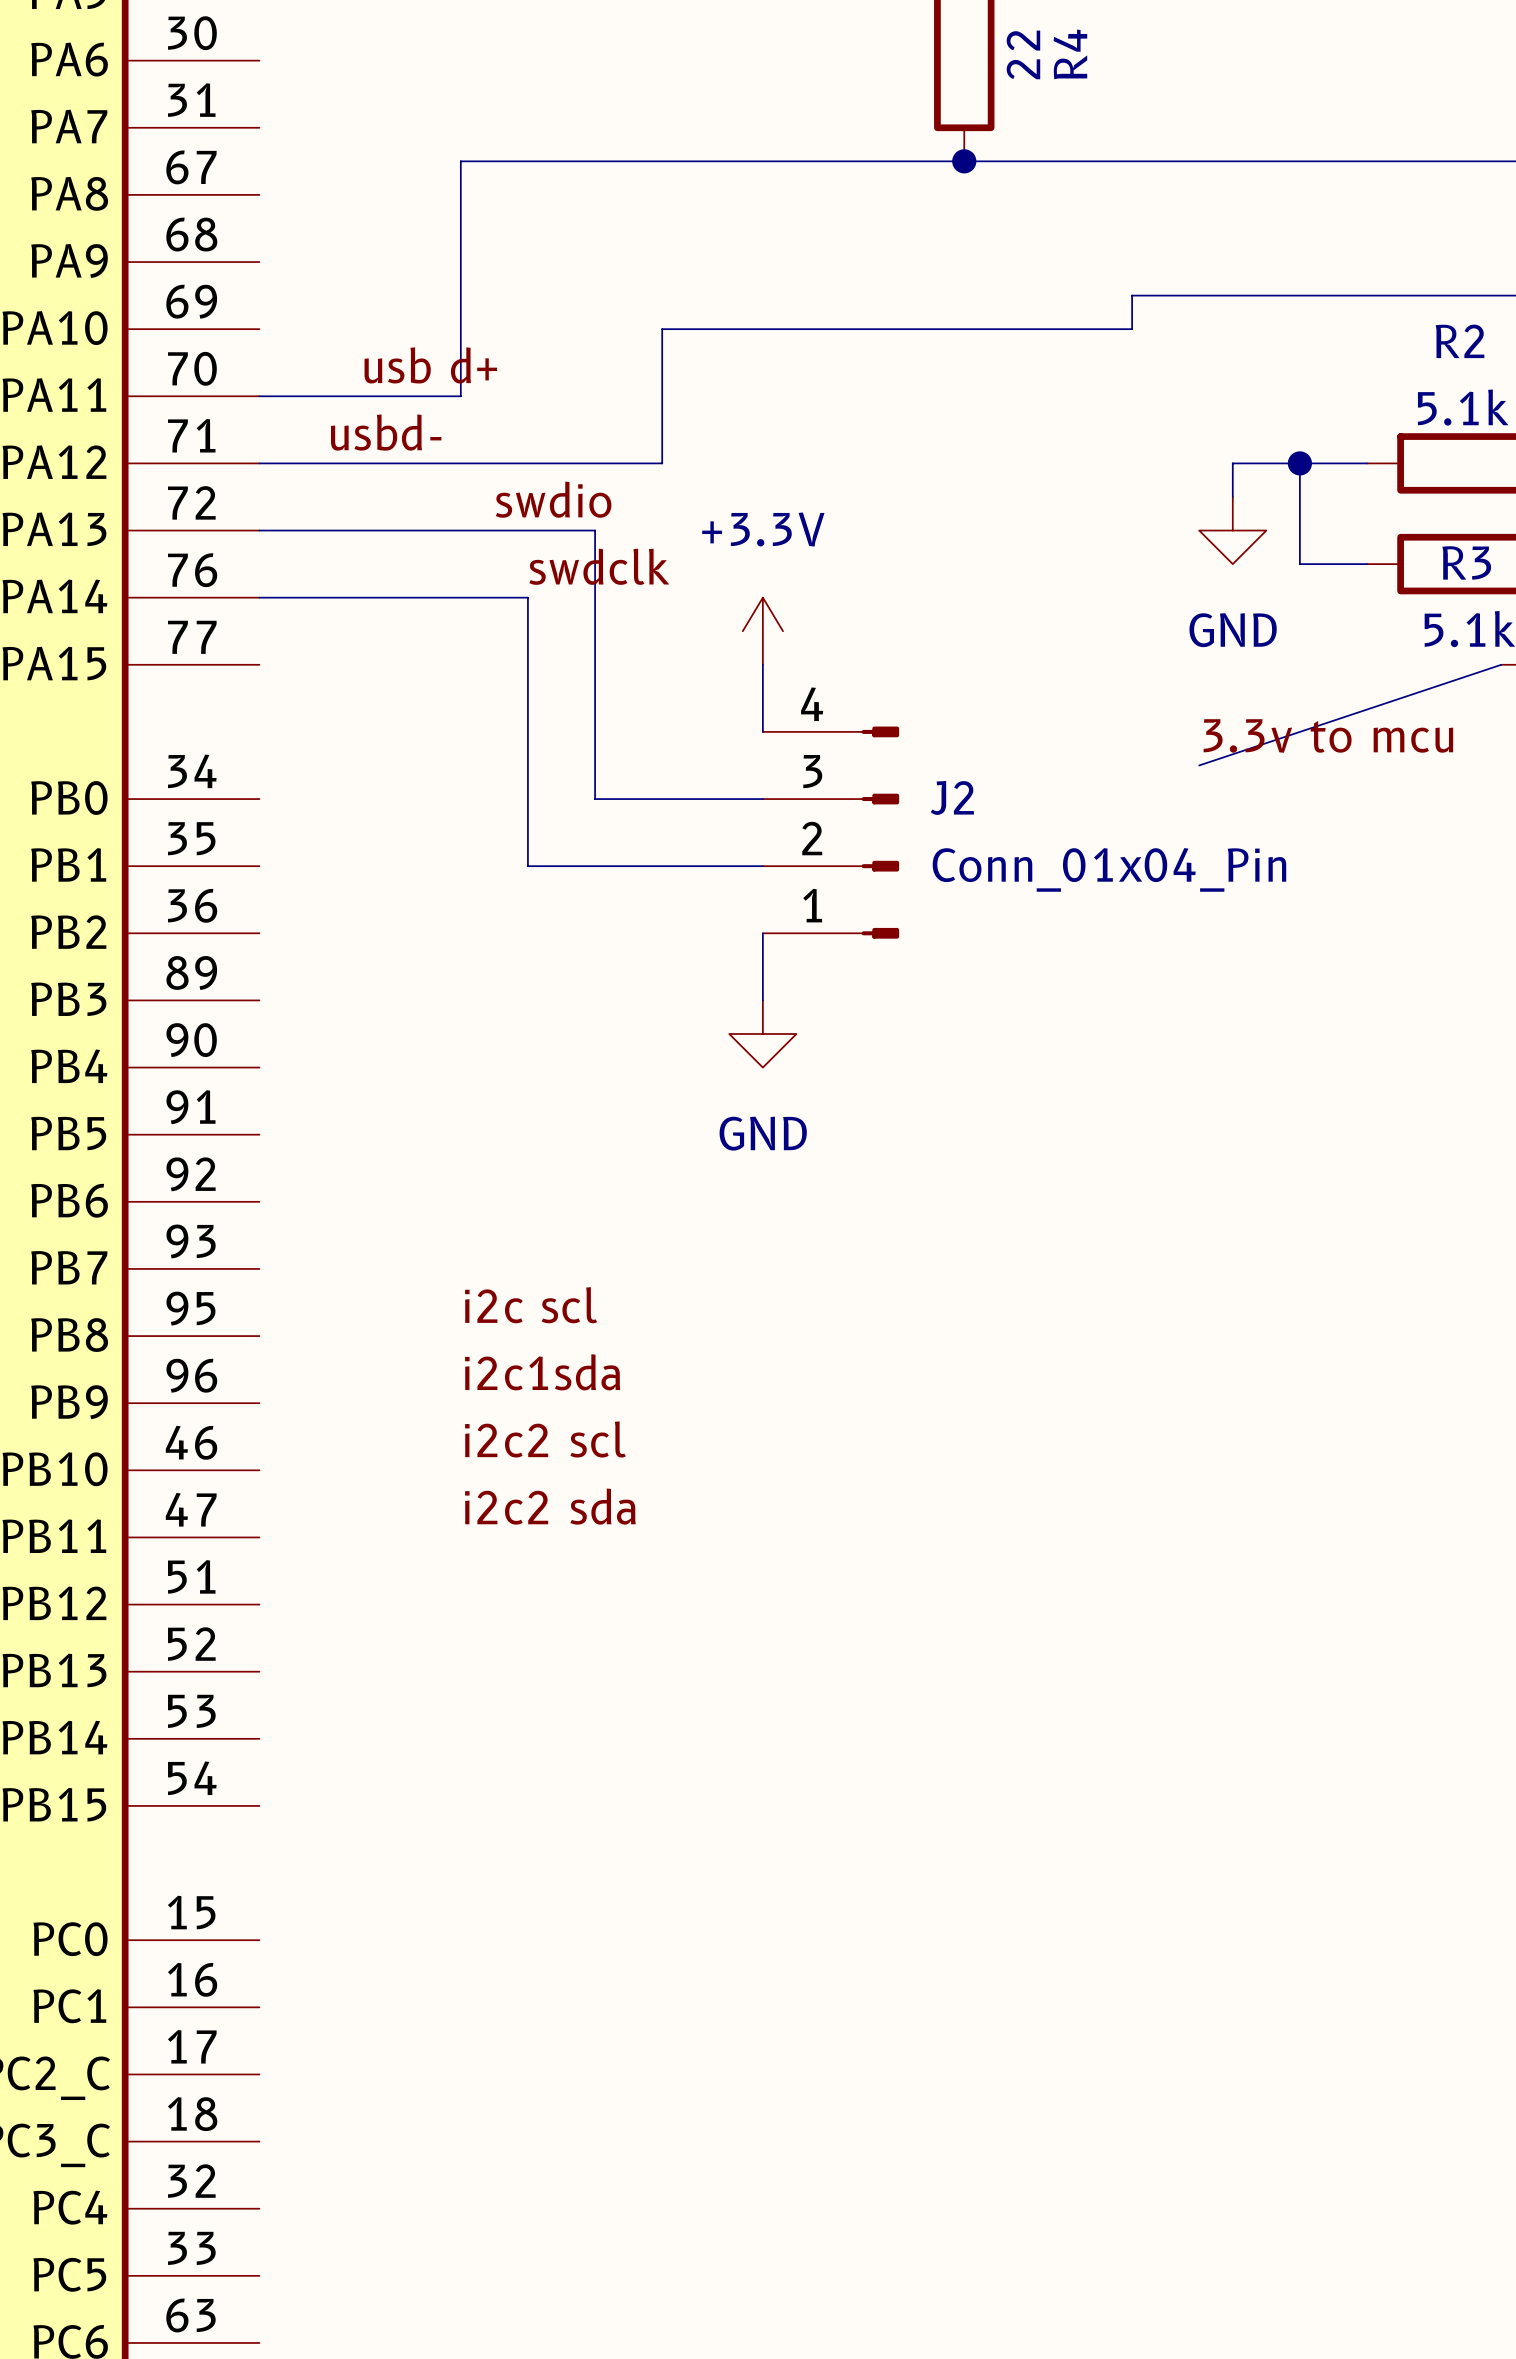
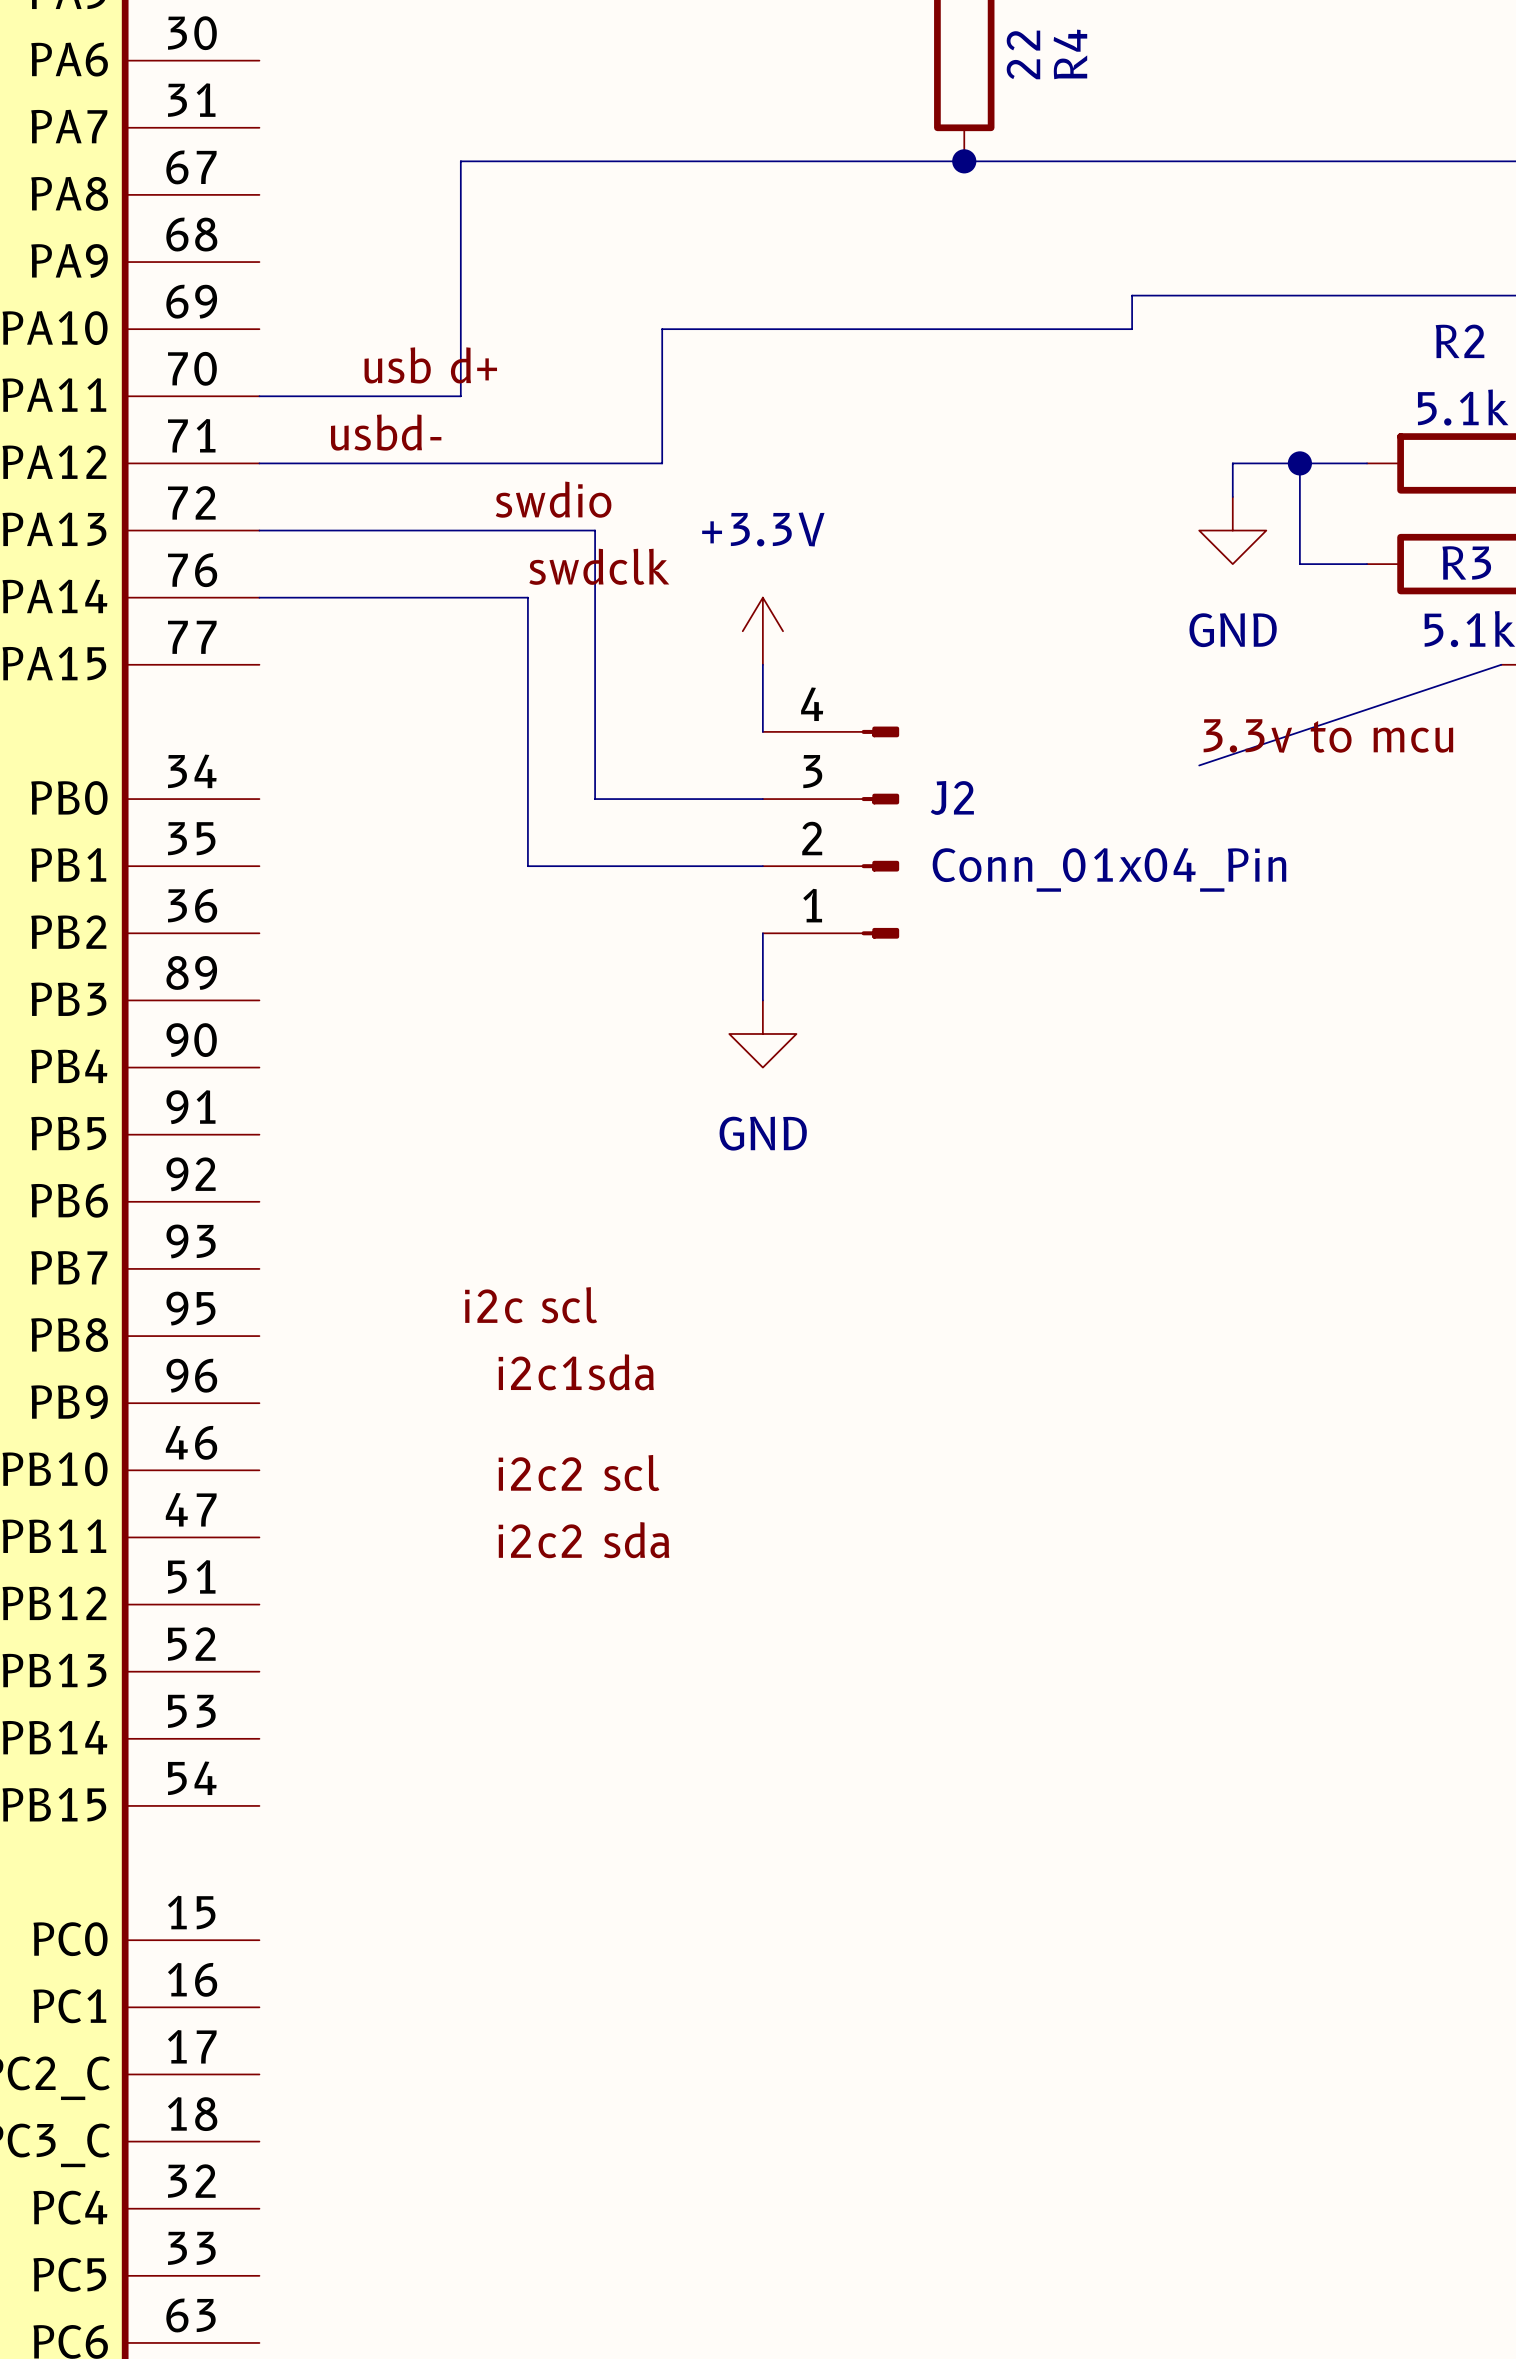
label position: i2c1sda (542, 1372) -> i2c1sda (576, 1372)
label position: i2c2 scl (545, 1439) -> i2c2 scl (579, 1473)
label position: i2c2 sda (550, 1506) -> i2c2 sda (583, 1540)

